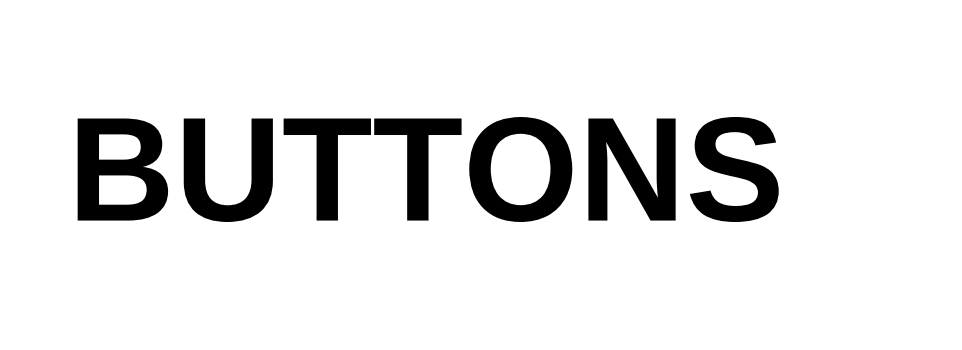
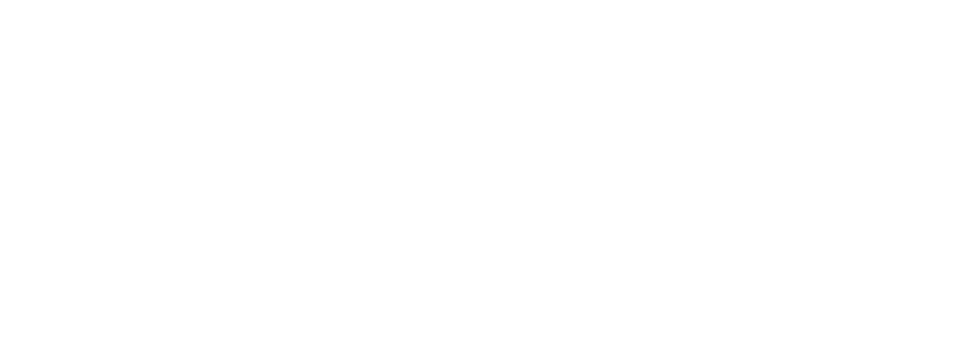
label: BUTTONS (428, 169) -> none

